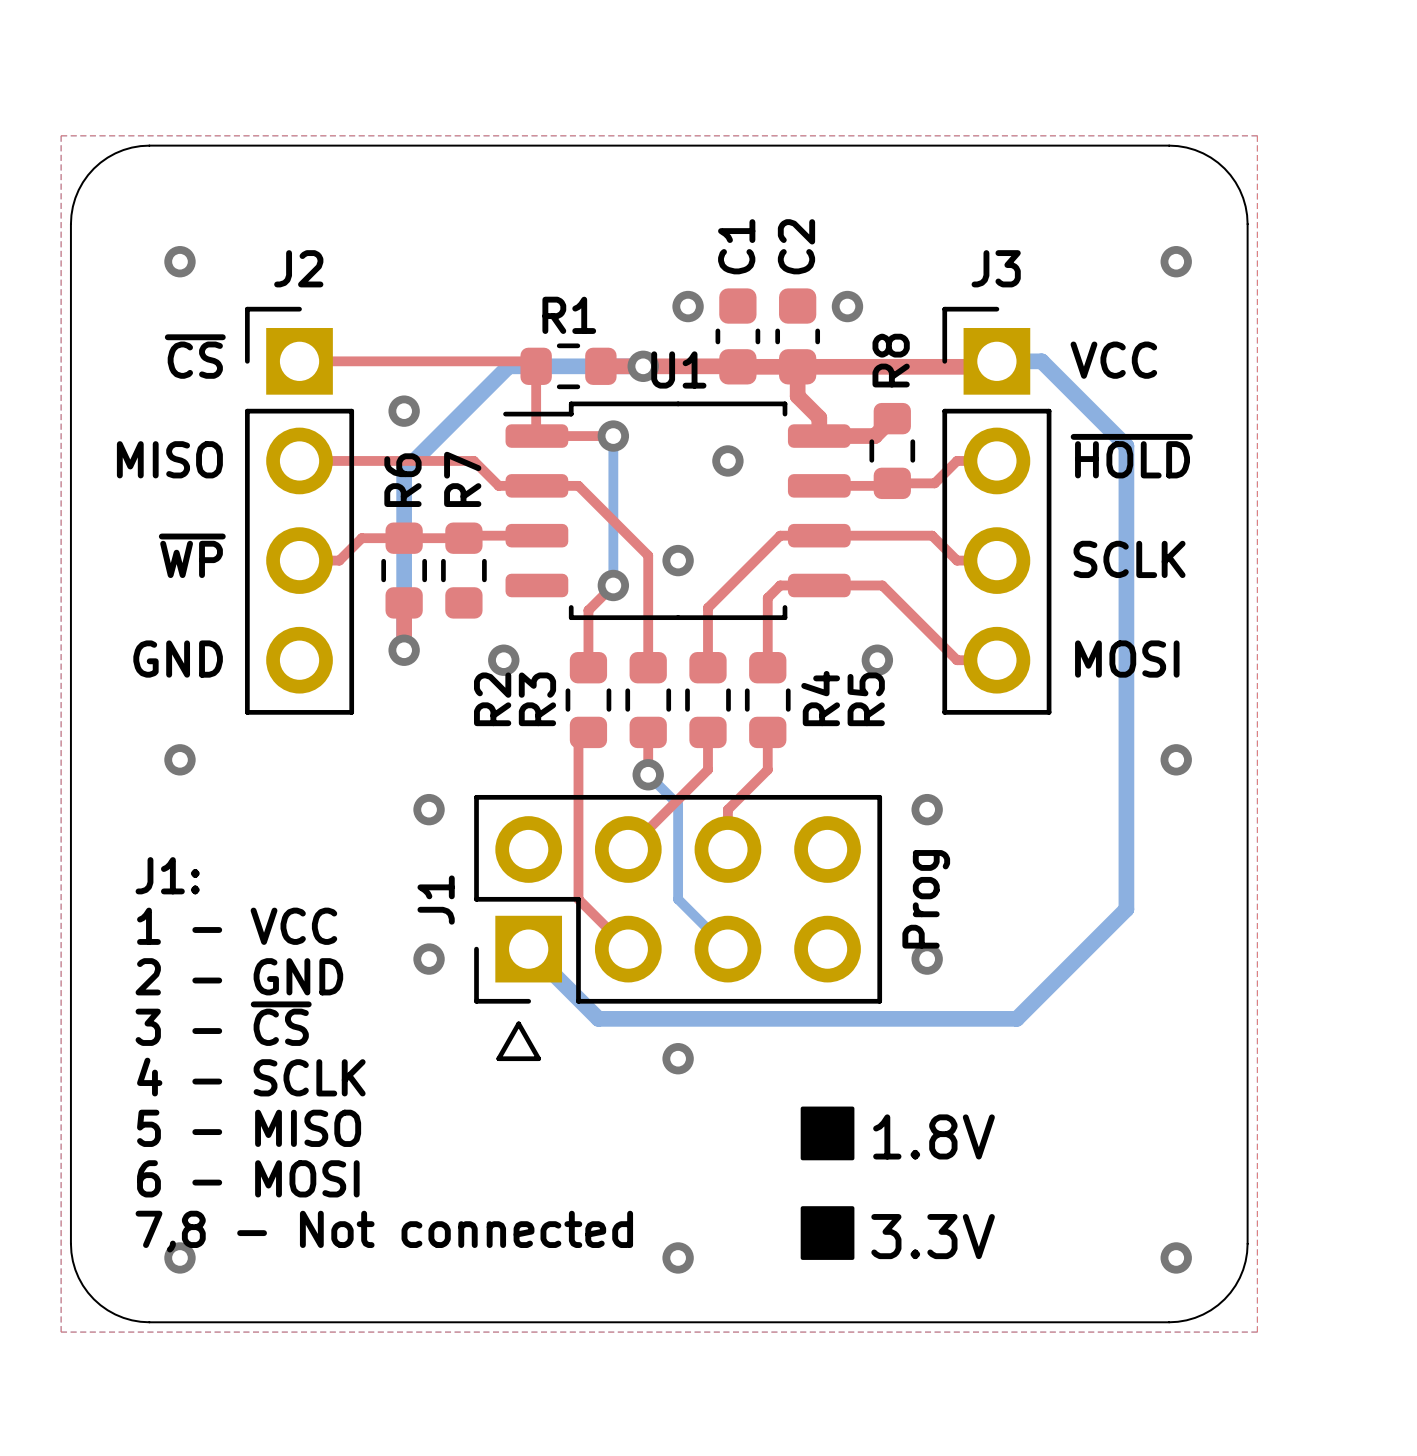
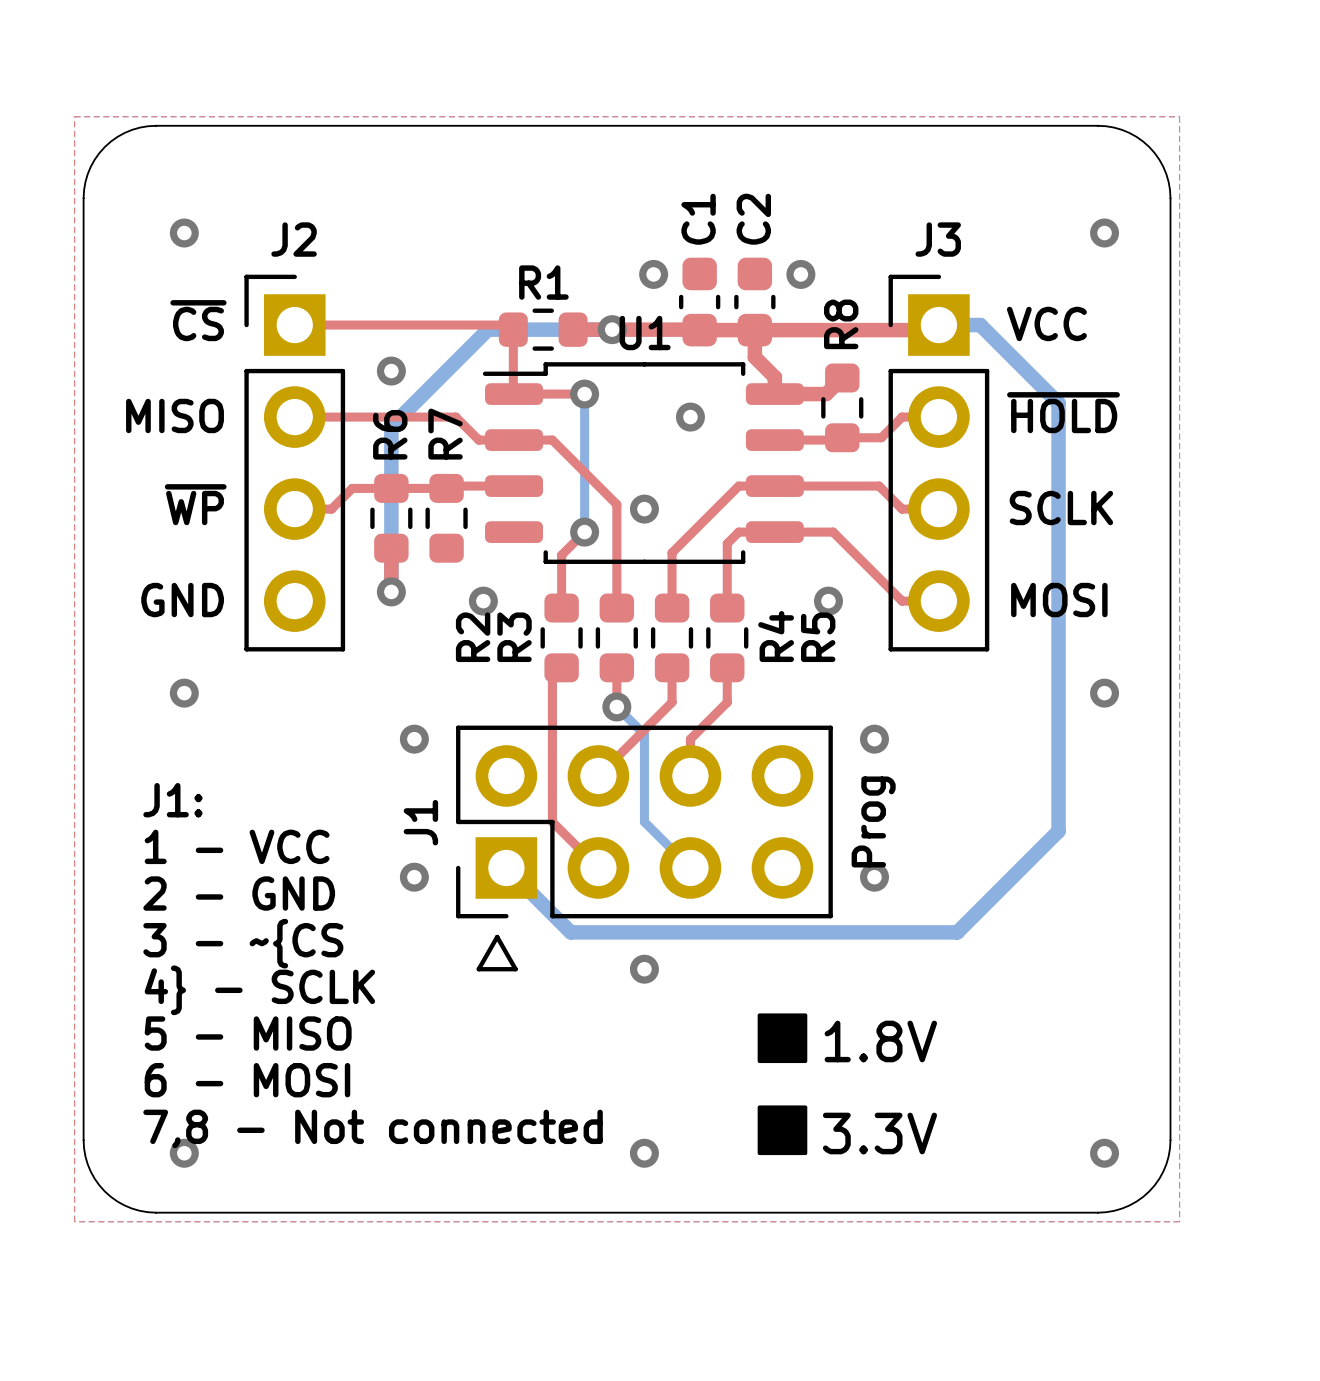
text: 3 - ~{CS} (223, 1023) -> 3 - ~{CS (243, 943)
text: 4 - SCLK (251, 1077) -> 4} - SCLK (259, 990)

